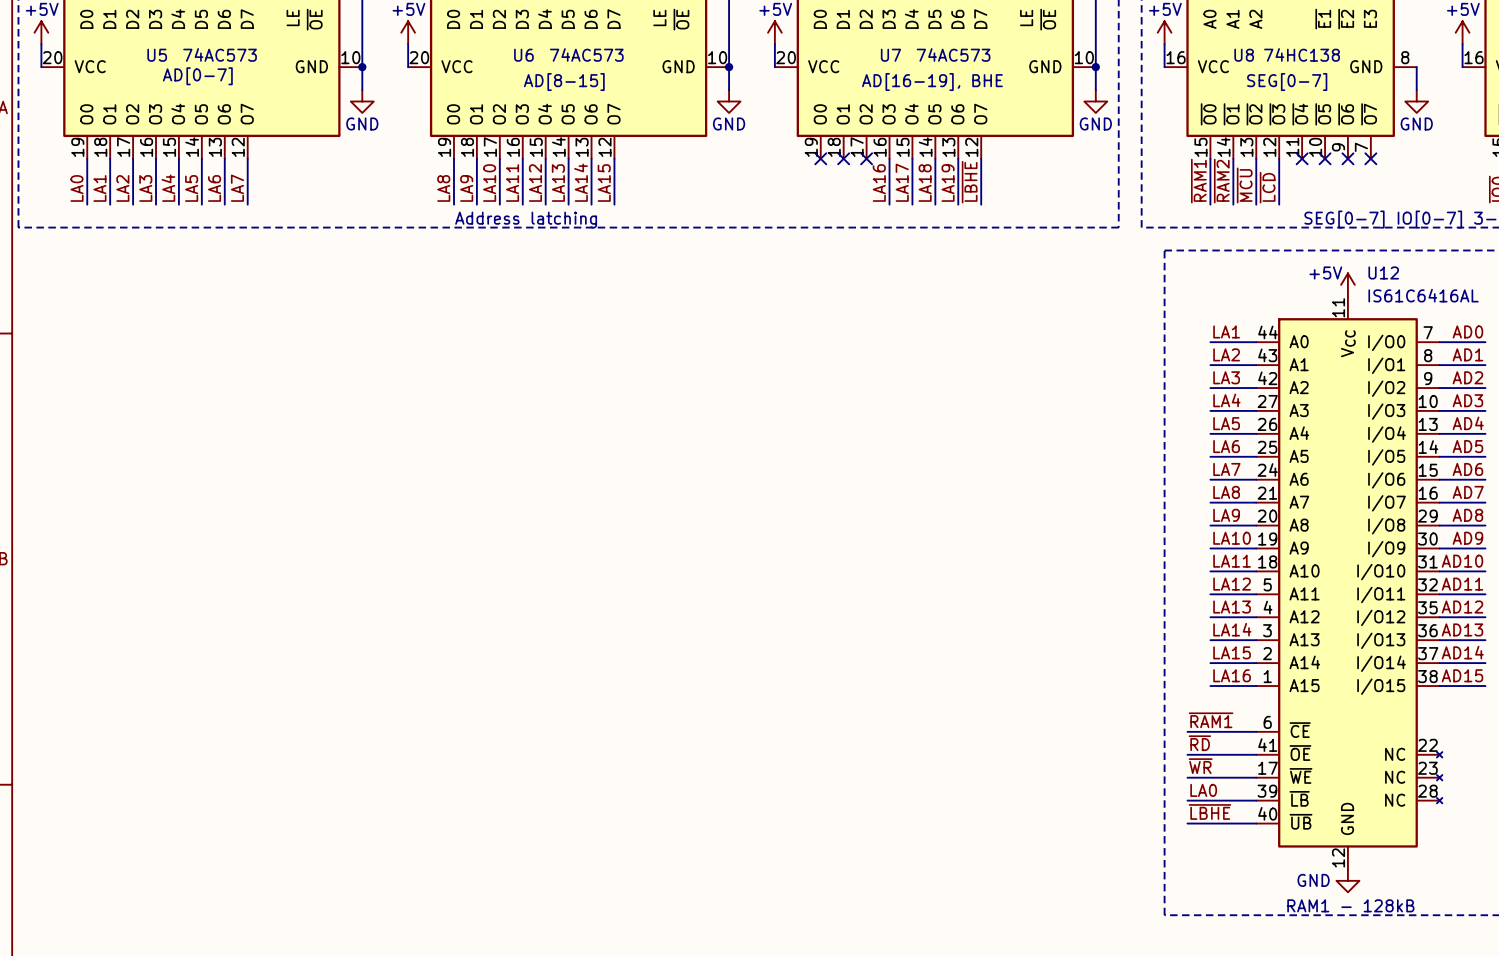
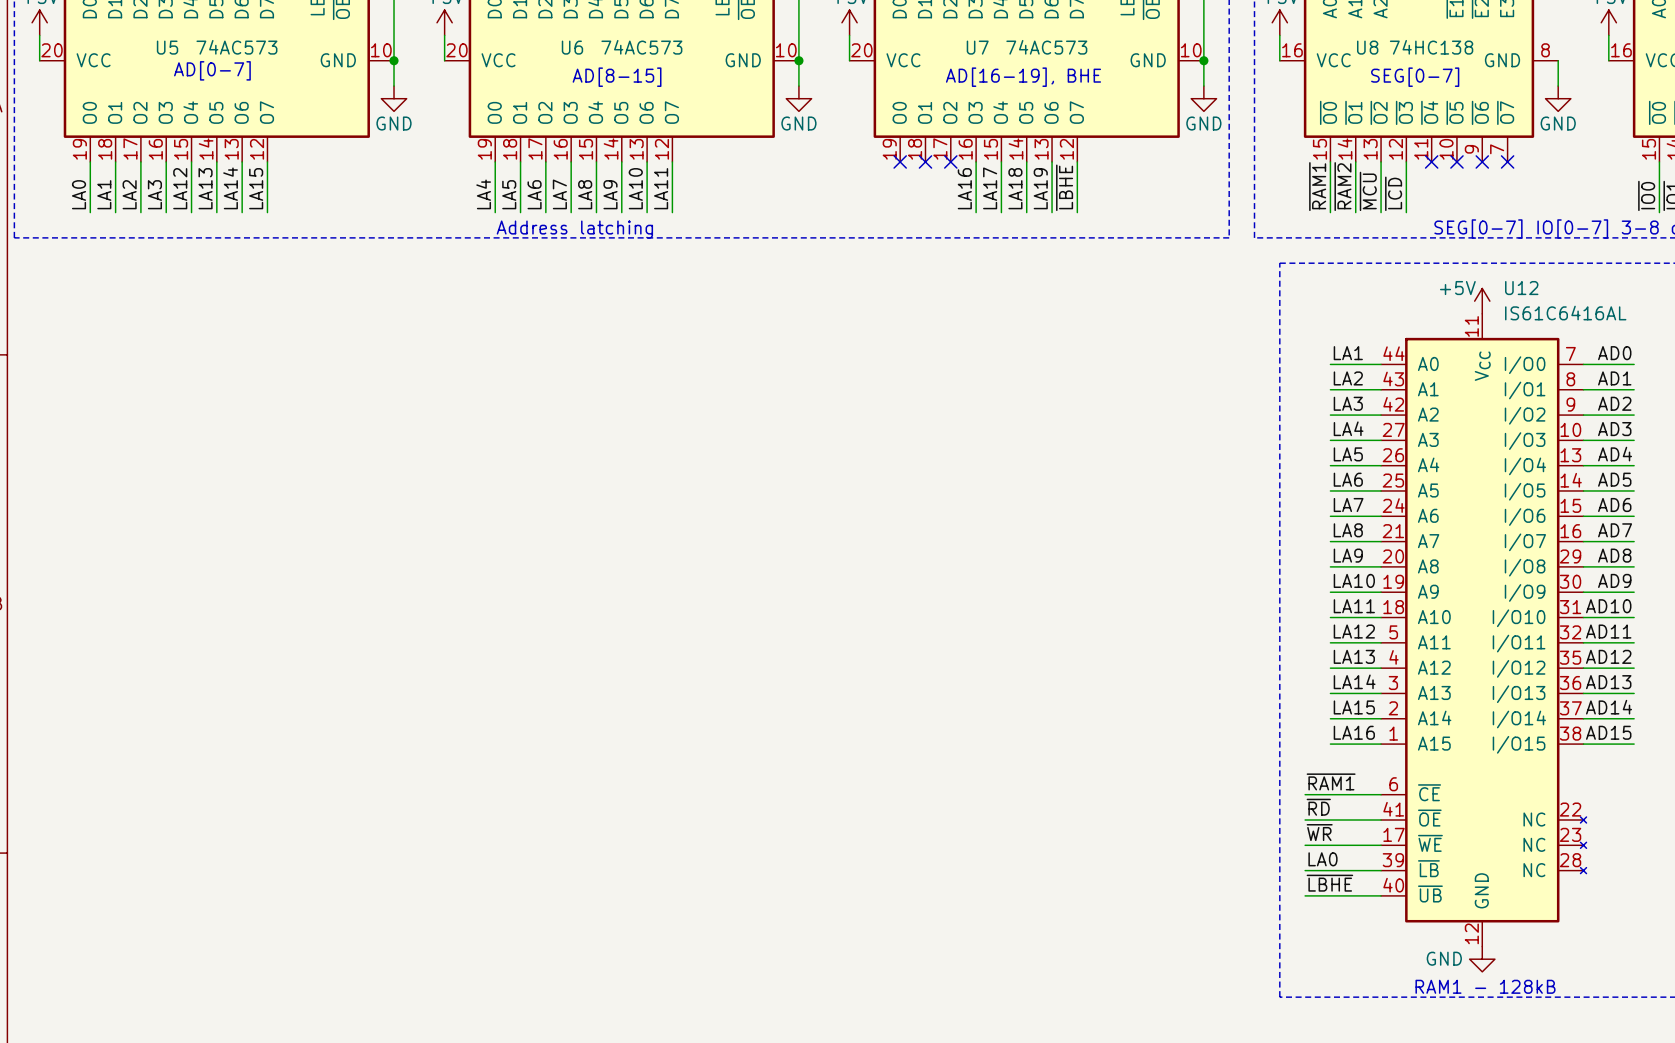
label: LA14 (581, 182) -> LA10 (635, 188)
label: LA10 (489, 183) -> LA6 (534, 194)
label: LA11 (512, 183) -> LA7 (559, 194)
label: LA12 (535, 183) -> LA8 (585, 194)
label: LA13 (558, 183) -> LA9 (610, 194)
label: LA15 (604, 183) -> LA11 (661, 188)
label: LA4 (168, 188) -> LA12 (180, 188)
label: LA5 (191, 188) -> LA13 (205, 188)
label: LA6 (214, 188) -> LA14 (230, 188)
label: LA7 (237, 188) -> LA15 (256, 188)
label: LA8 (443, 188) -> LA4 (483, 194)
label: LA9 (466, 188) -> LA5 (509, 194)

